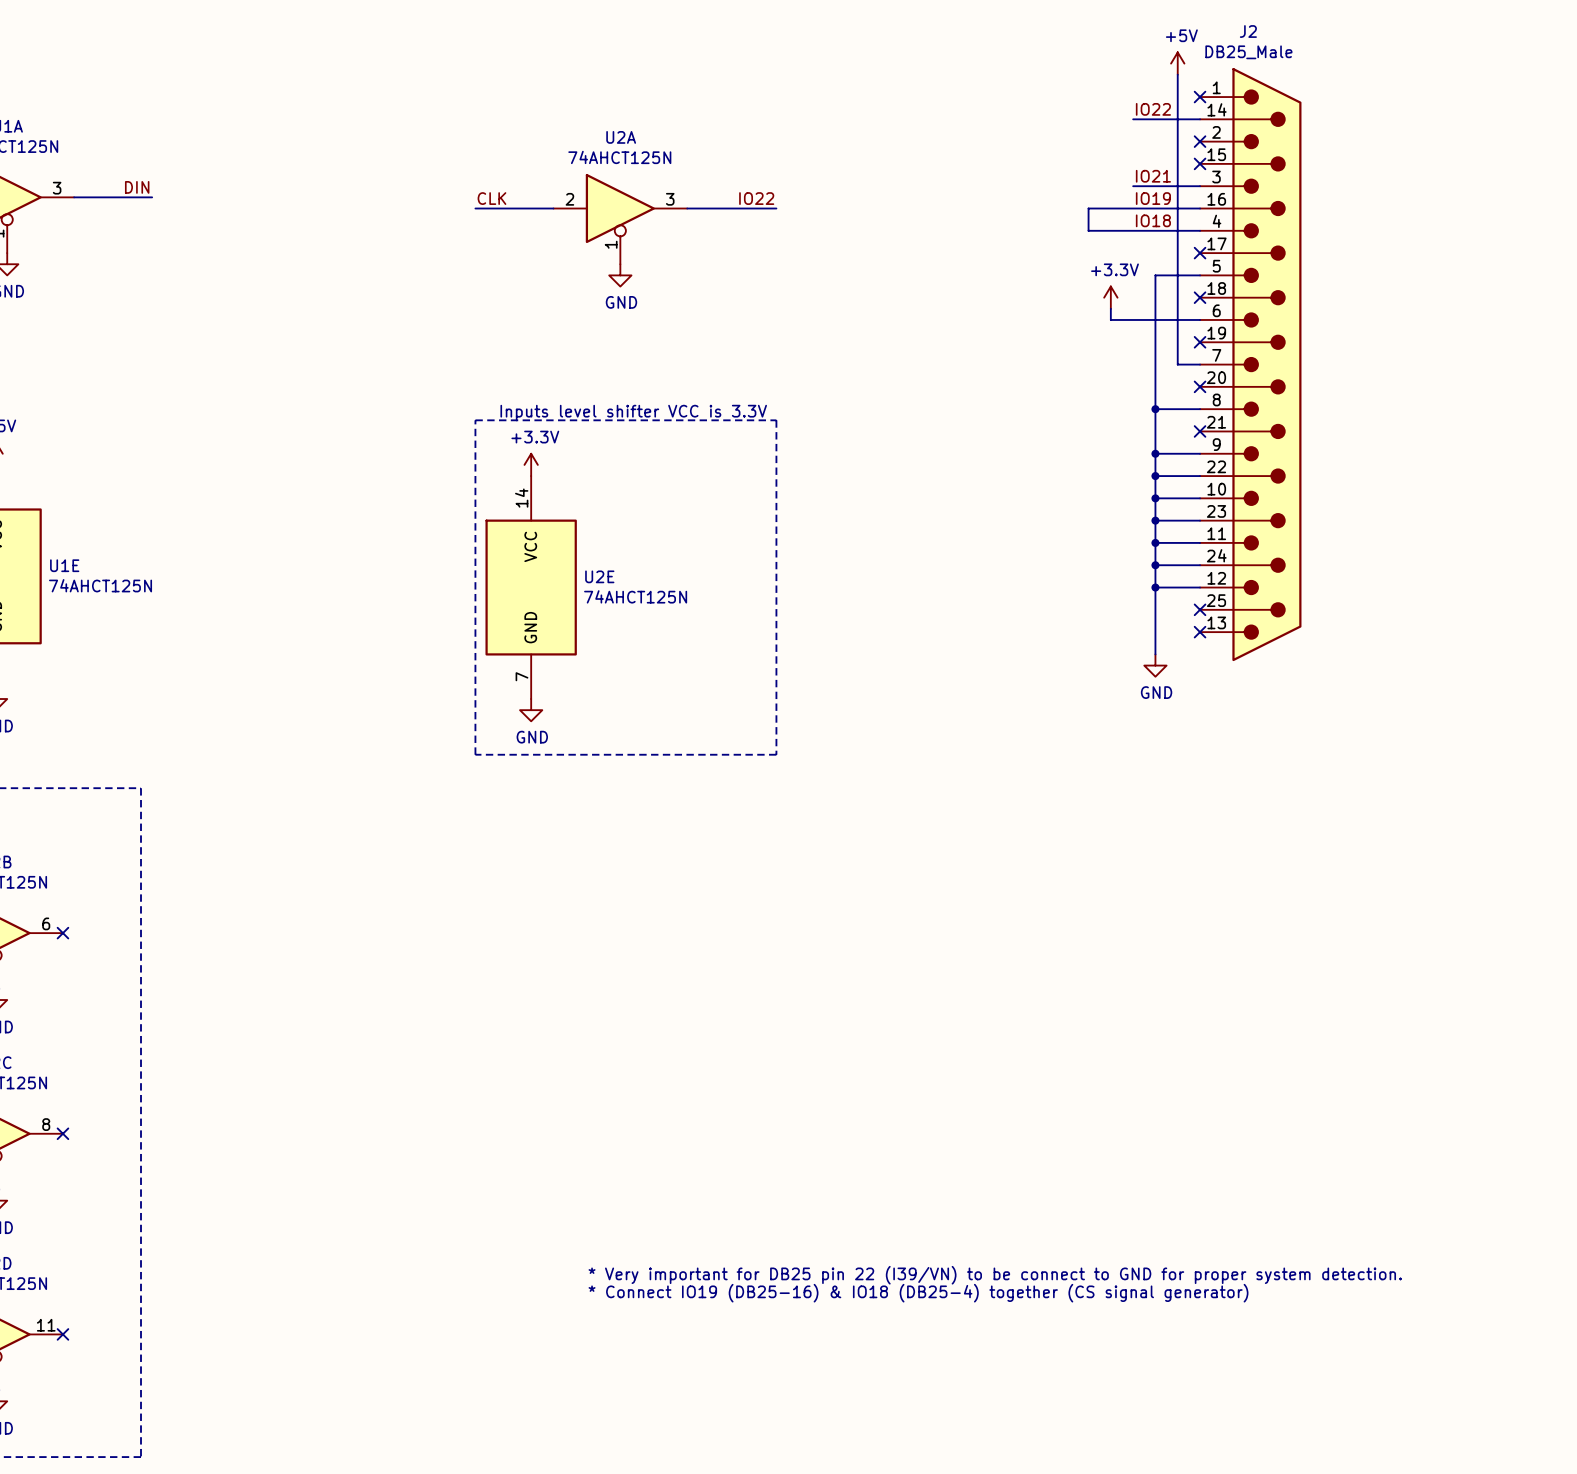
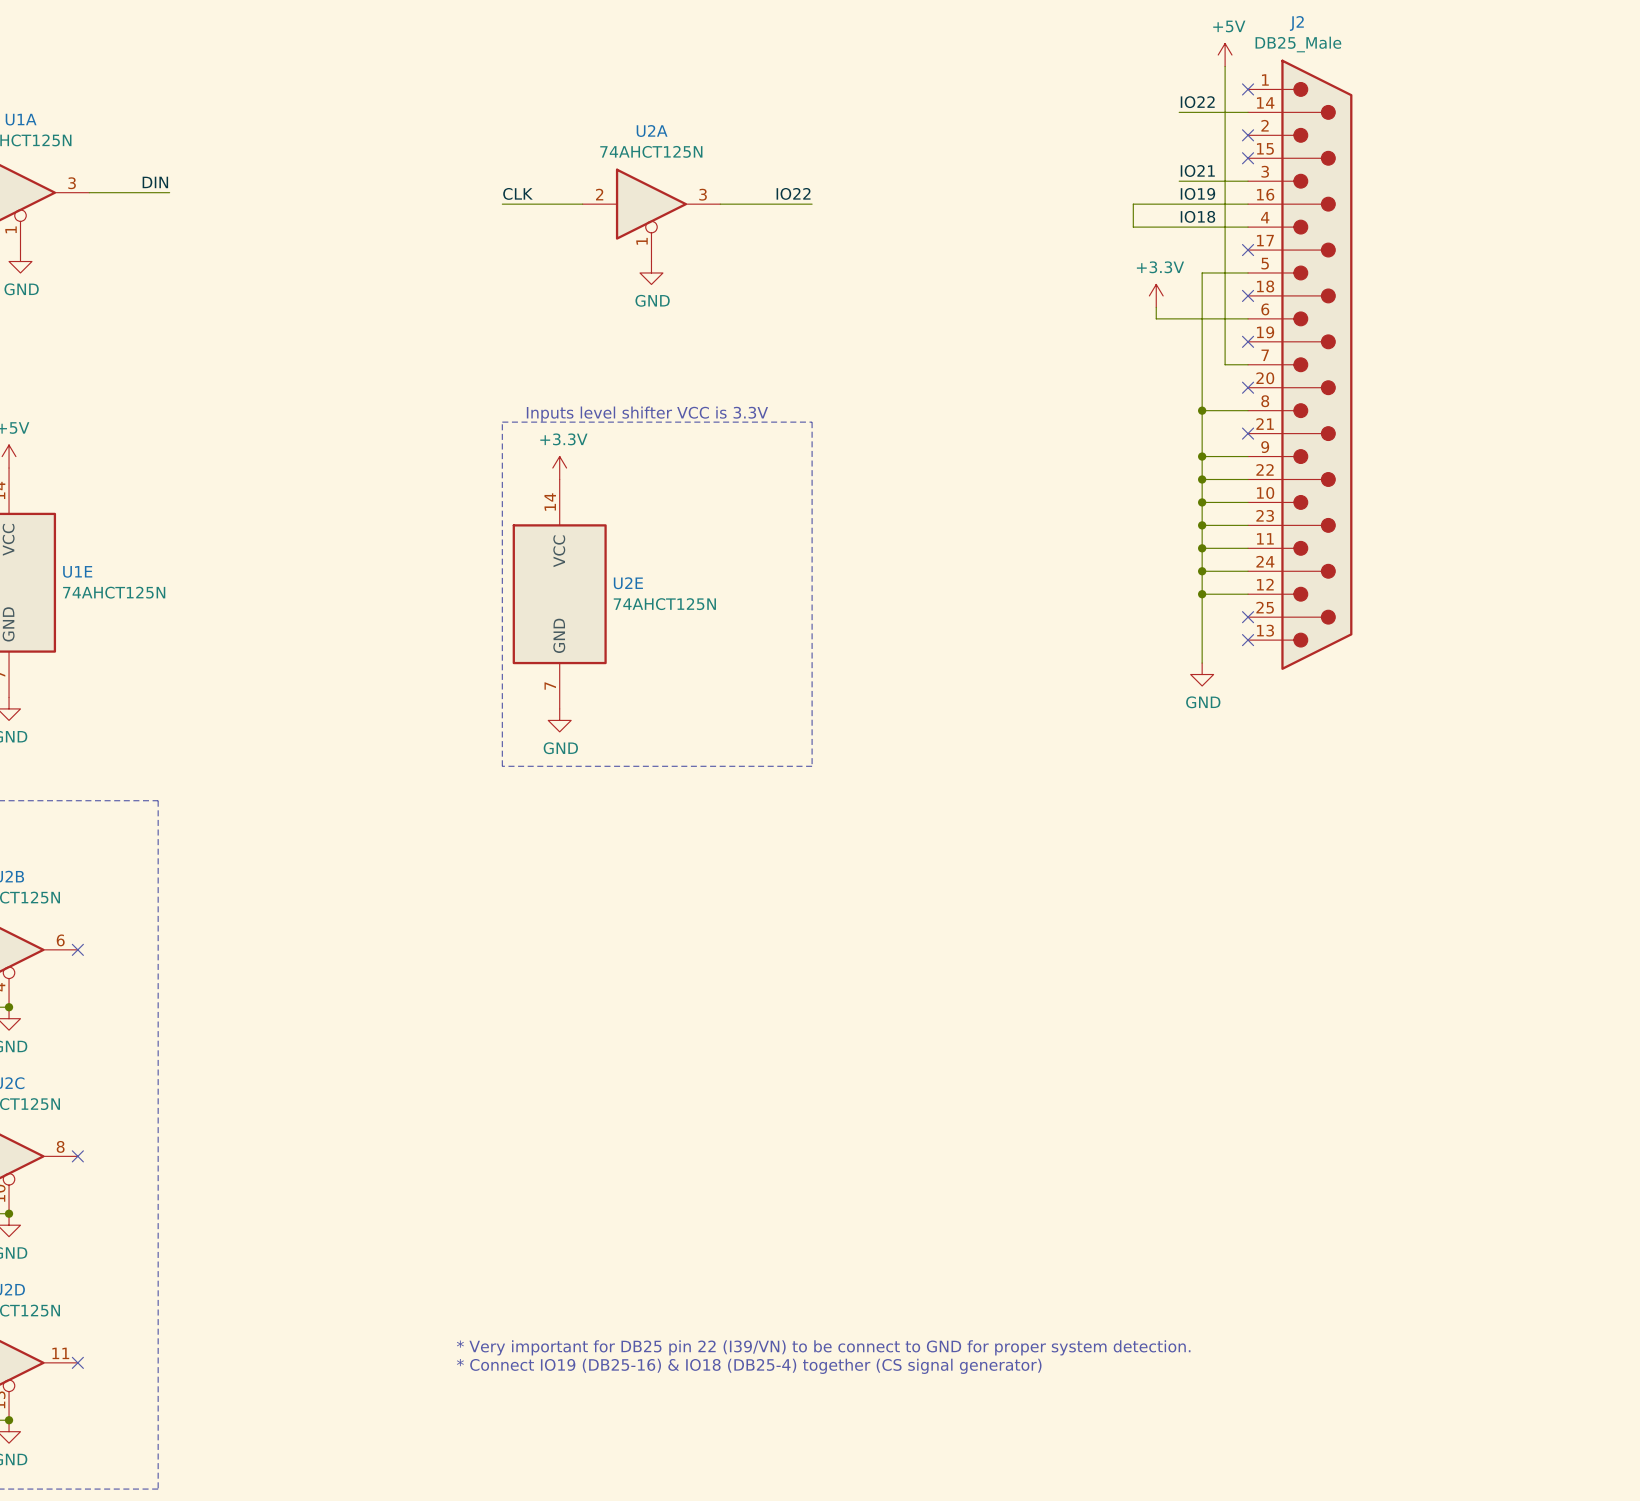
text position: * Very important for DB25 pin 22 (I39/VN) to be connect to GND for proper system detection. (995, 1275) -> * Very important for DB25 pin 22 (I39/VN) to be connect to GND for proper system detection. (823, 1347)
text position: * Connect IO19 (DB25-16) & IO18 (DB25-4) together (CS signal generator) (918, 1293) -> * Connect IO19 (DB25-16) & IO18 (DB25-4) together (CS signal generator) (749, 1366)

